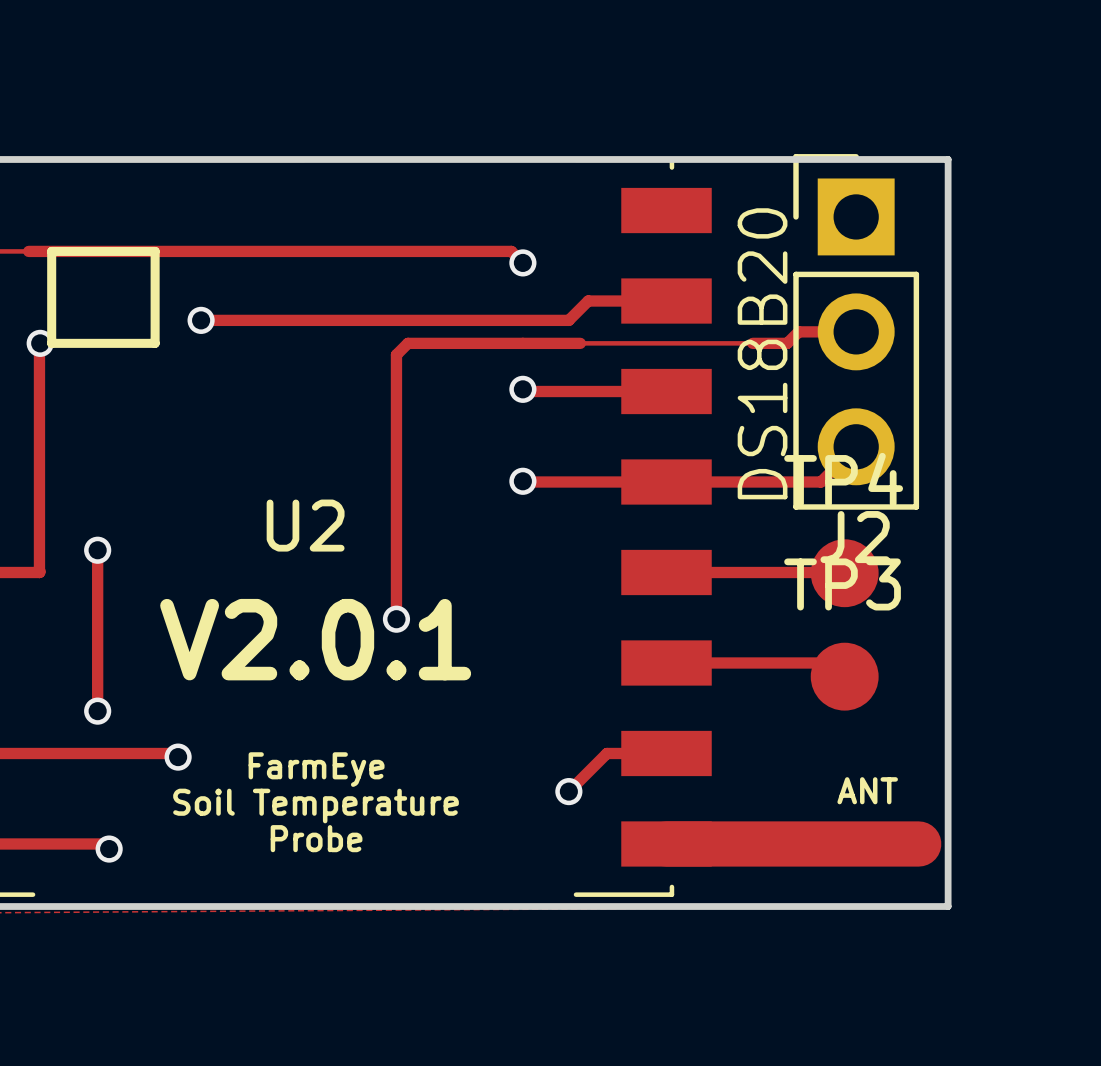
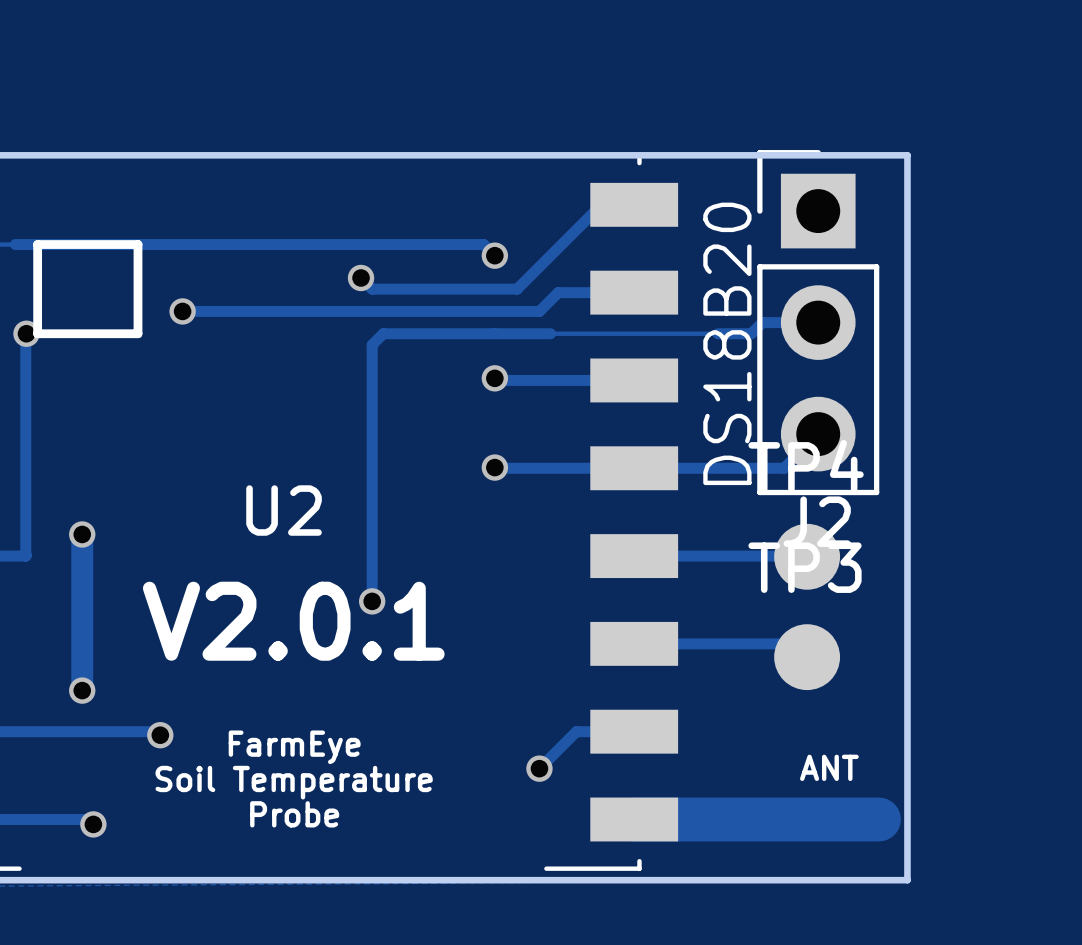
track: none -> (601, 204) (517, 289) (372, 289) (361, 277)
via: none -> (361, 277)
track width: thin (97, 550) (97, 711) -> thick (82, 534) (82, 690)

